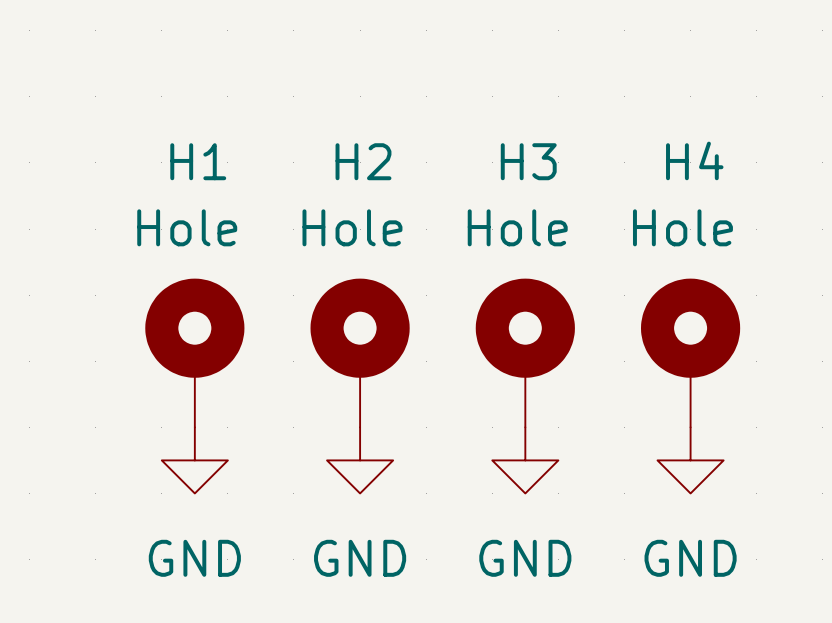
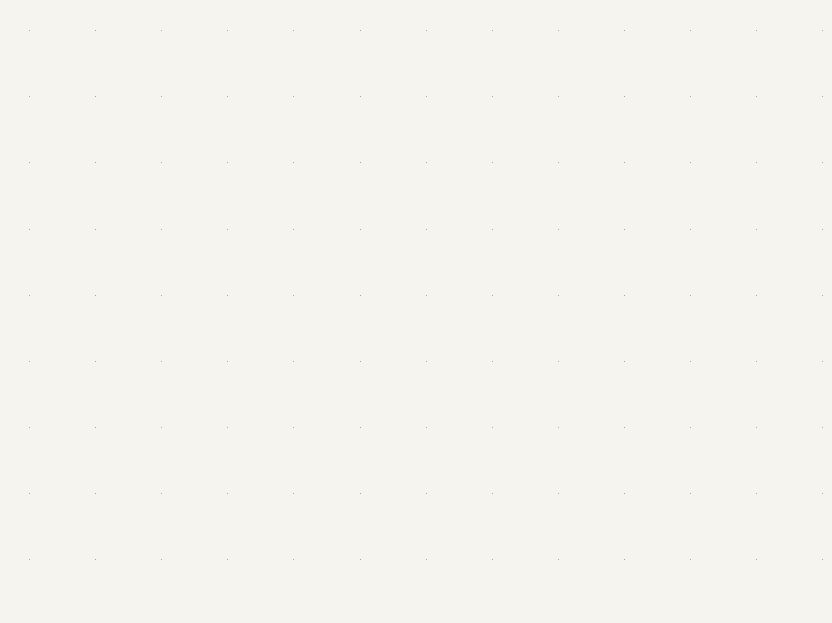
H1: Hole (194, 352) -> none
H2: Hole (360, 352) -> none
H3: Hole (525, 352) -> none
H4: Hole (690, 352) -> none
power symbol: GND (194, 460) -> none
power symbol: GND (360, 460) -> none
power symbol: GND (525, 460) -> none
power symbol: GND (690, 460) -> none

